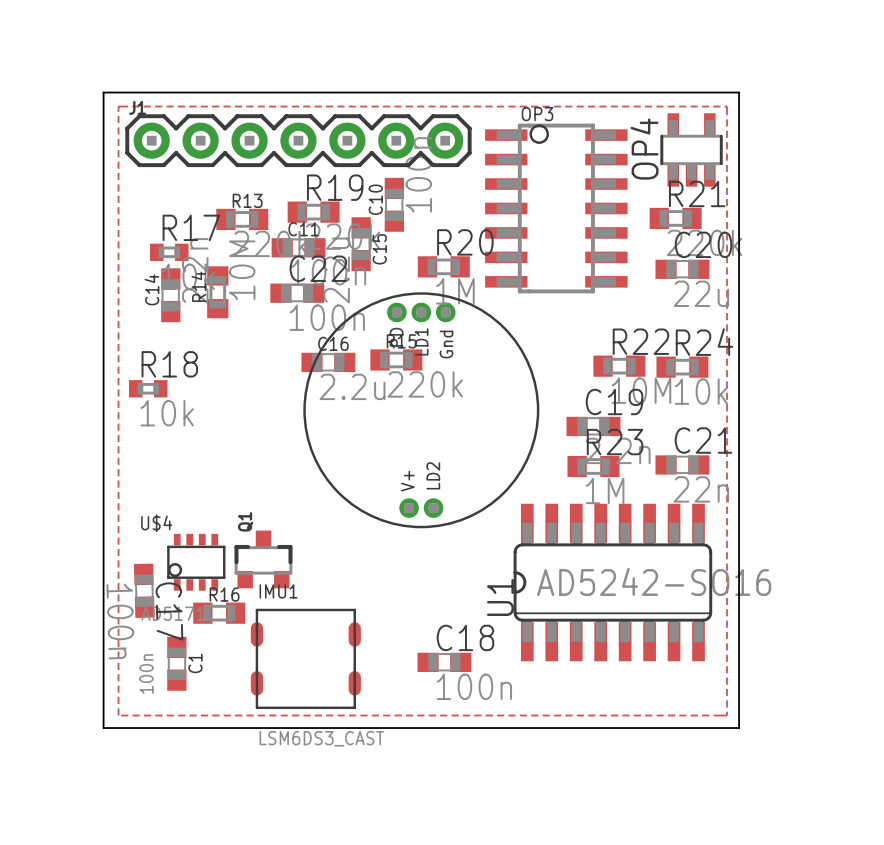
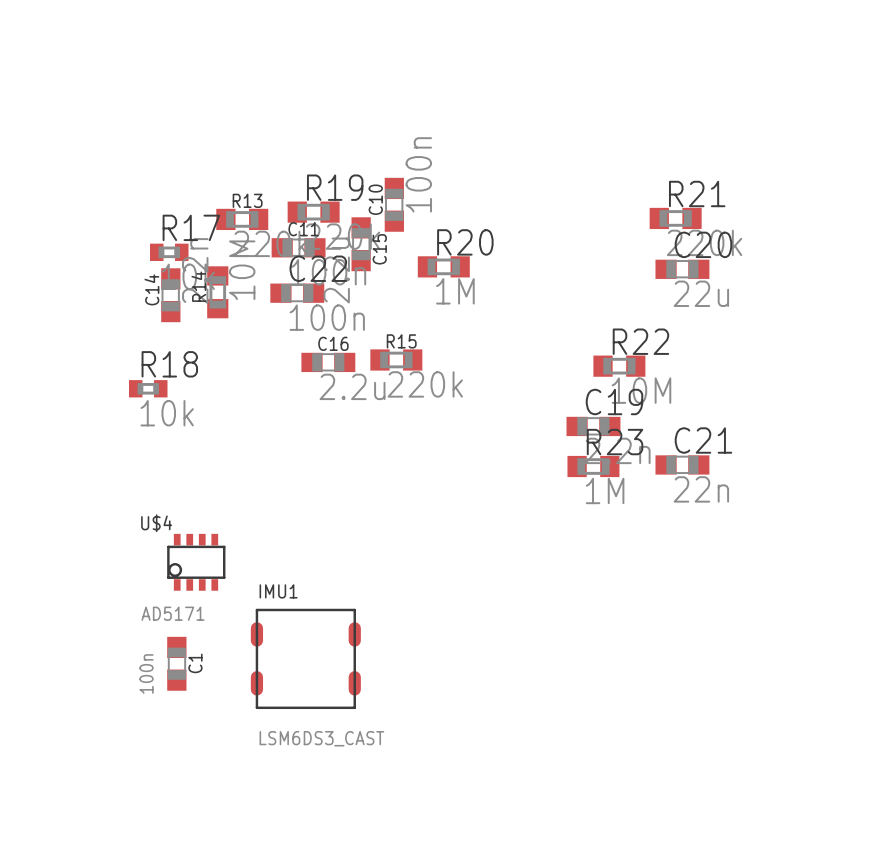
board edge: (103, 92) (739, 92) (739, 728) (103, 728) (103, 92) -> none
zone outline: (118, 106) (727, 106) (727, 715) (118, 715) (118, 106) -> none
J1: (298, 140) -> none
OP4: (691, 149) -> none
OP3: (556, 208) -> none
R24: 10k (682, 367) -> none
part: (421, 410) -> none
Q1: (263, 559) -> none
U1: AD5242-SO16 (612, 582) -> none
C17: 100n (144, 590) -> none
R16: (219, 613) -> none
C18: 100n (444, 662) -> none

